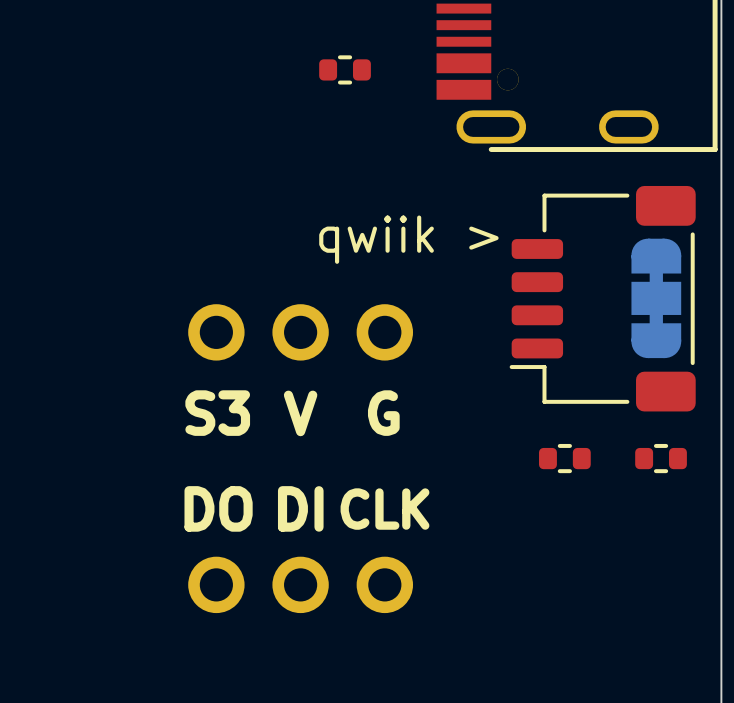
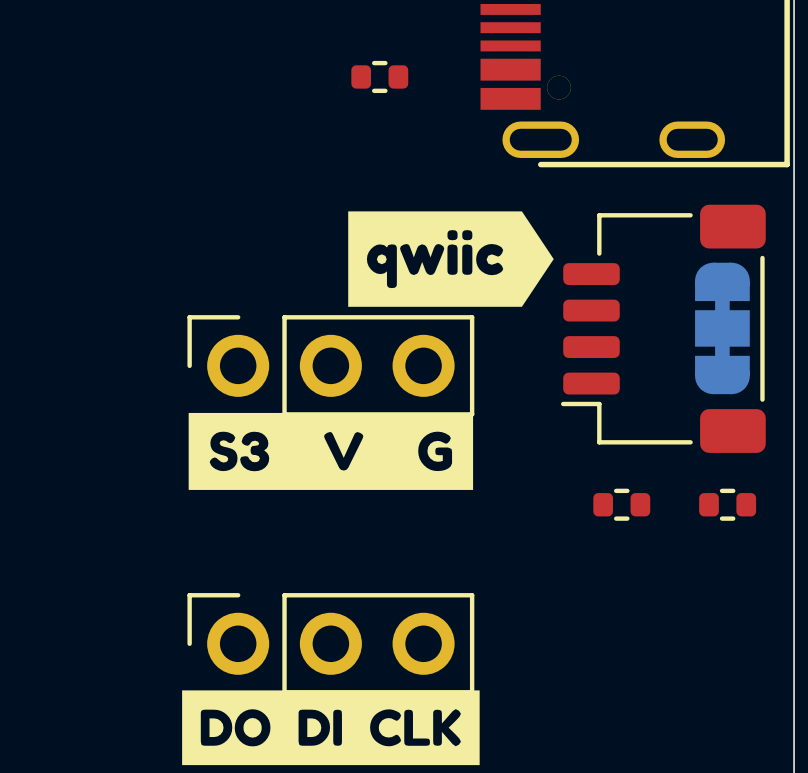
drawing: none -> [348, 211, 554, 307]
text: qwiik > (408, 239) -> none
part footprint: [188, 304, 414, 361] -> [187, 315, 475, 417]
drawing: none -> [188, 412, 474, 490]
text: S3 (217, 413) -> none
text: V (300, 413) -> none
text: G (383, 413) -> none
text: DO (218, 508) -> none
text: DI (300, 508) -> none
text: CLK (384, 509) -> none
part footprint: [188, 556, 414, 614] -> [187, 593, 475, 695]
drawing: none -> [182, 690, 480, 766]

